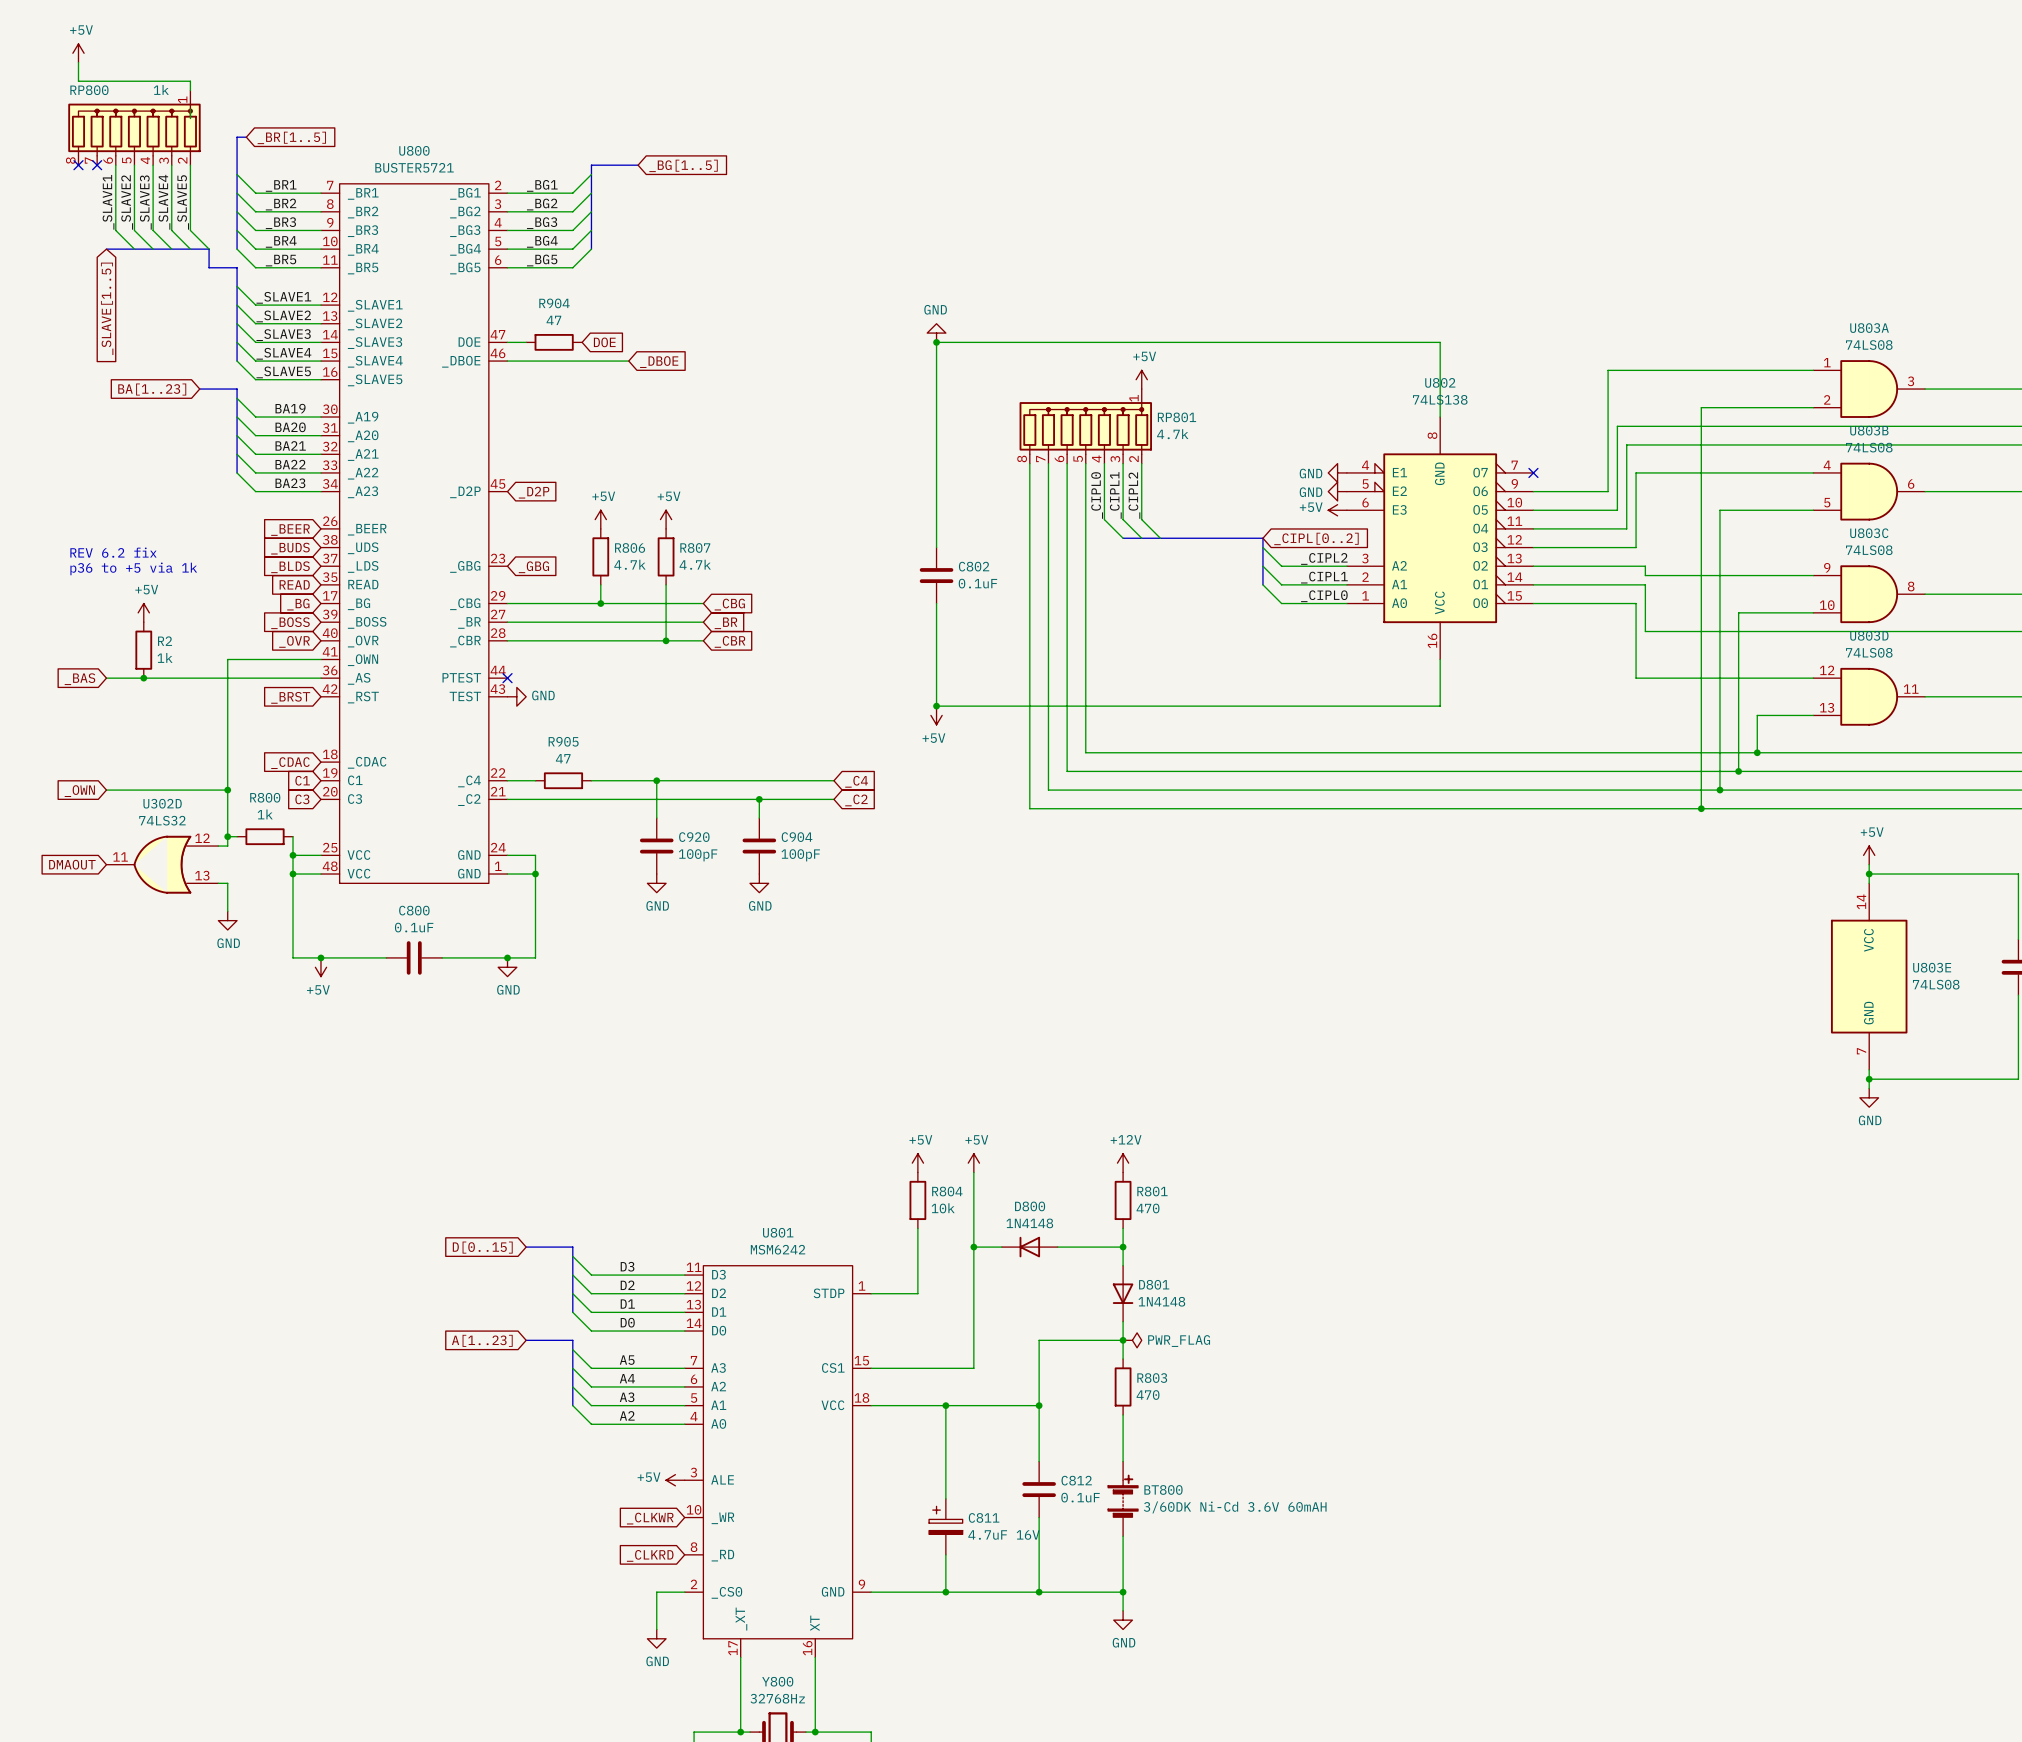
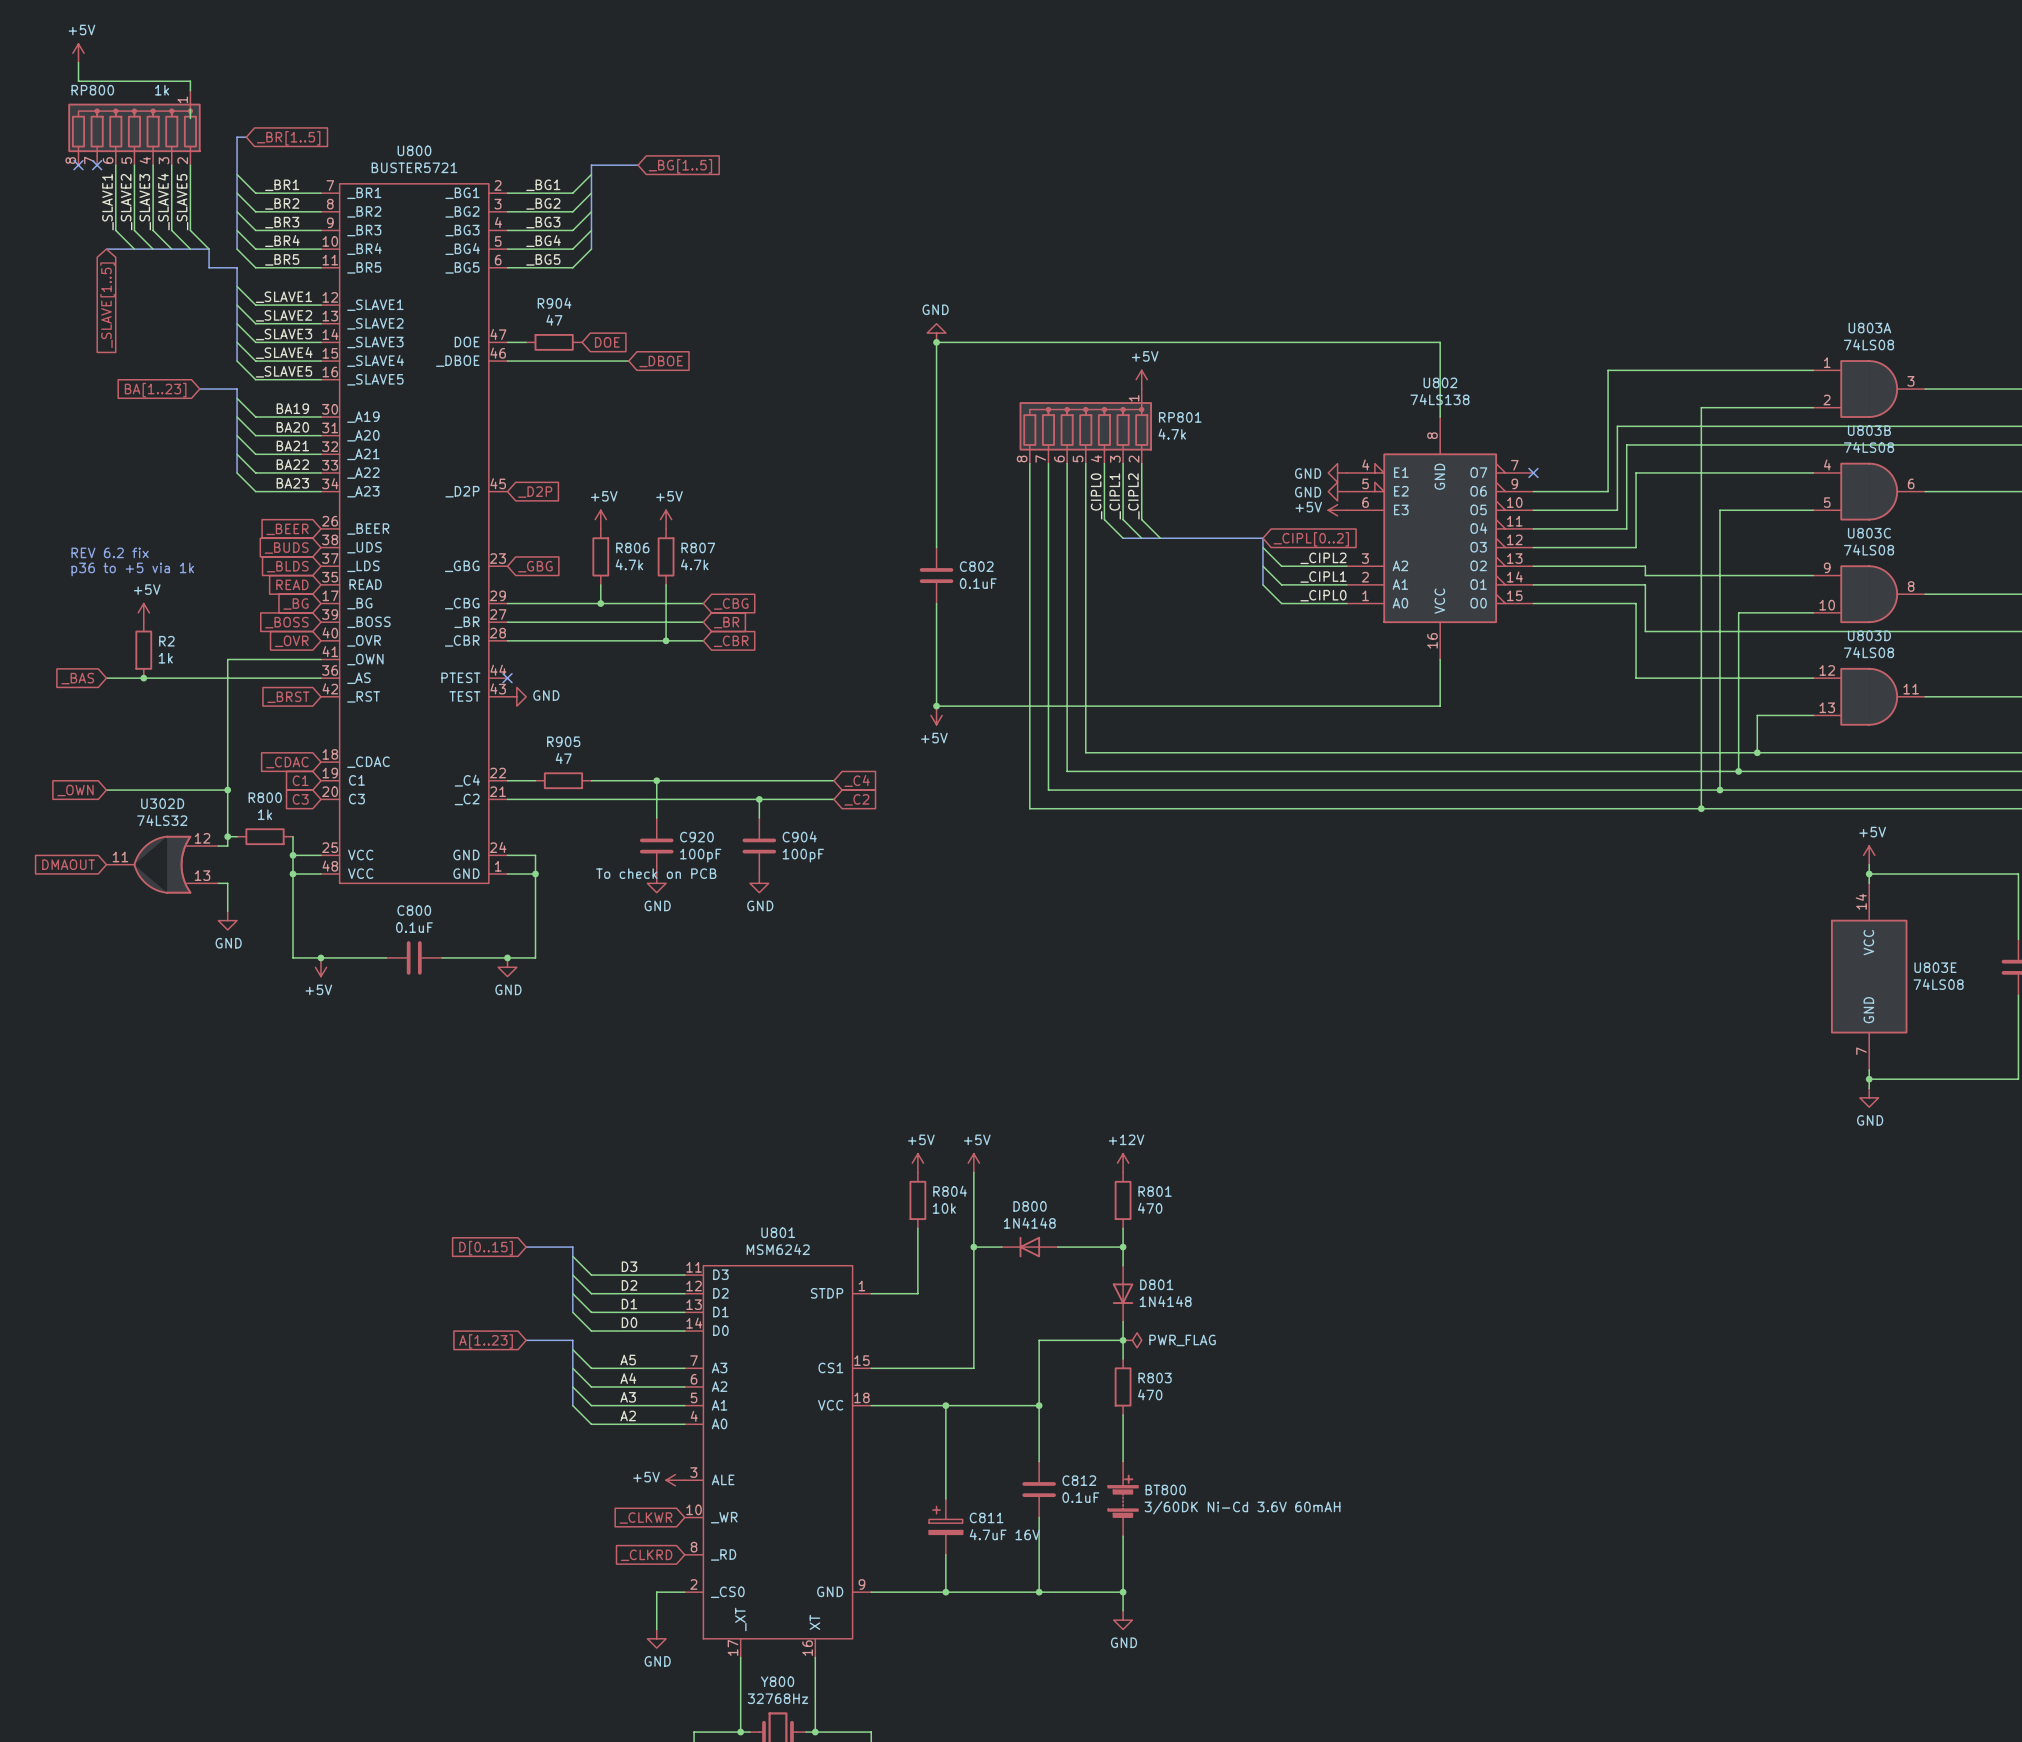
C920 text: none -> To check on PCB (656, 873)

